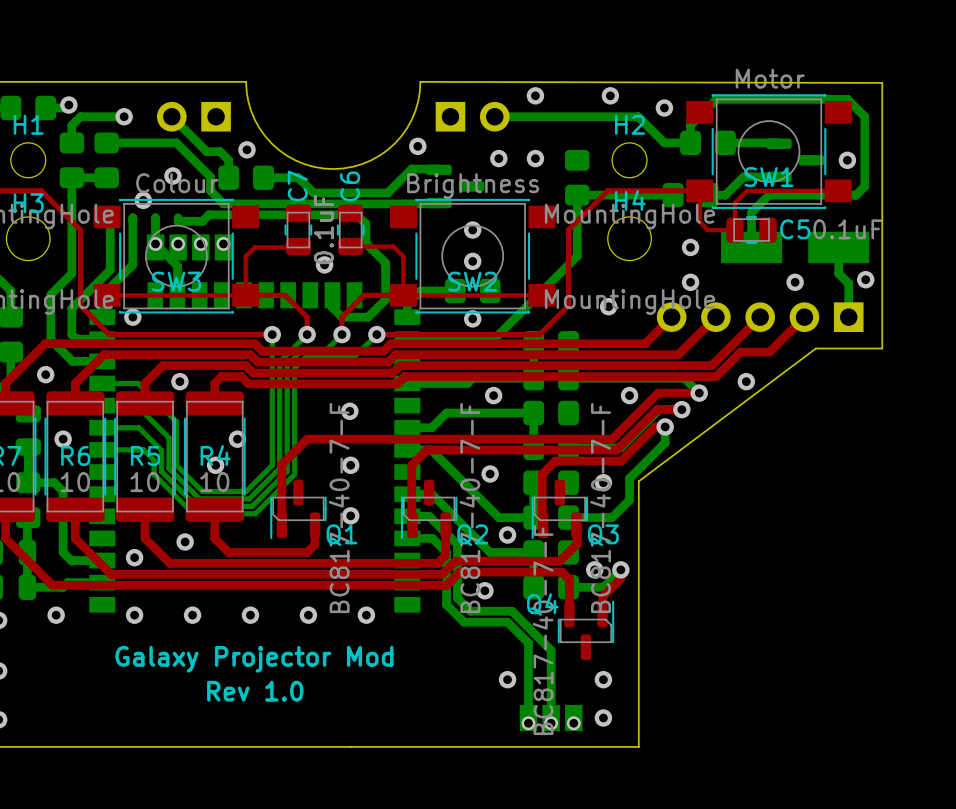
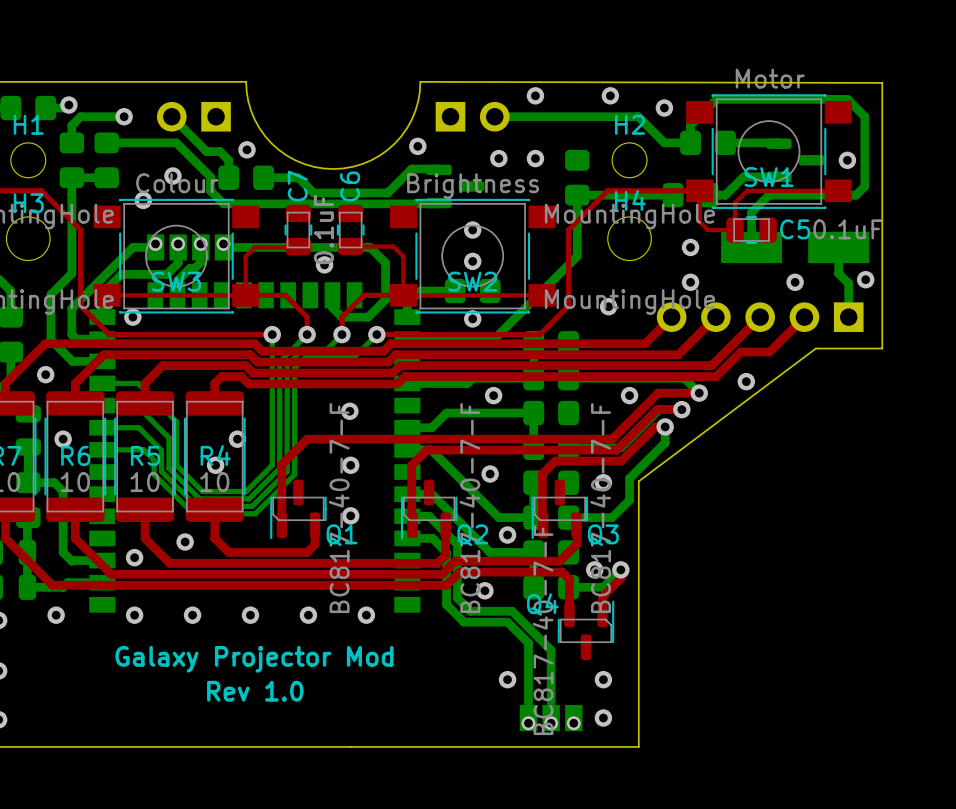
bottom track: (132, 217) (132, 264) (102, 295) -> (178, 247) (178, 263) (166, 274) (121, 274) (102, 295)
bottom track: (155, 217) (155, 243) (177, 265) (177, 280) -> (200, 247) (200, 262) (194, 268) (189, 268) (177, 280)
bottom track: (178, 217) (178, 221) (202, 221) (209, 214) (356, 214) (365, 223) (365, 243) (370, 247) -> (223, 247) (370, 247)
bottom track: (110, 221) (110, 270) -> (155, 247) (132, 247) (110, 270)
via: (179, 381) -> none

